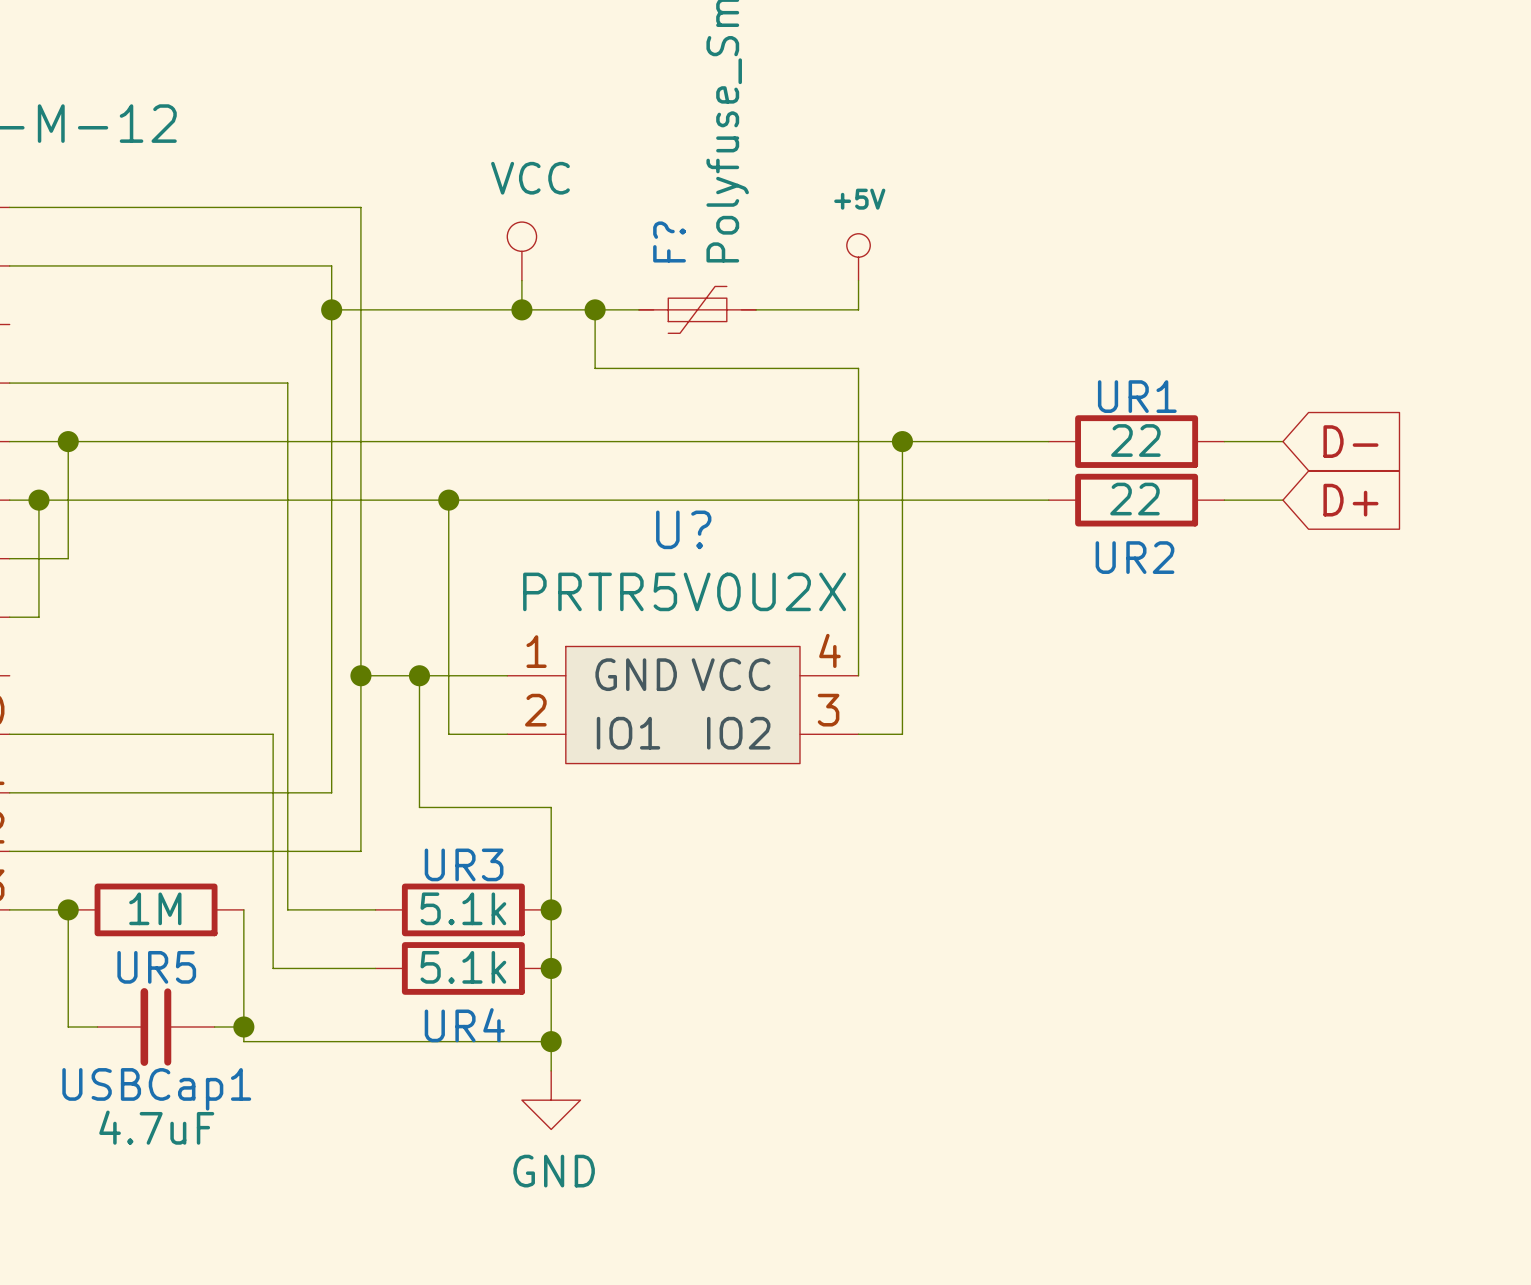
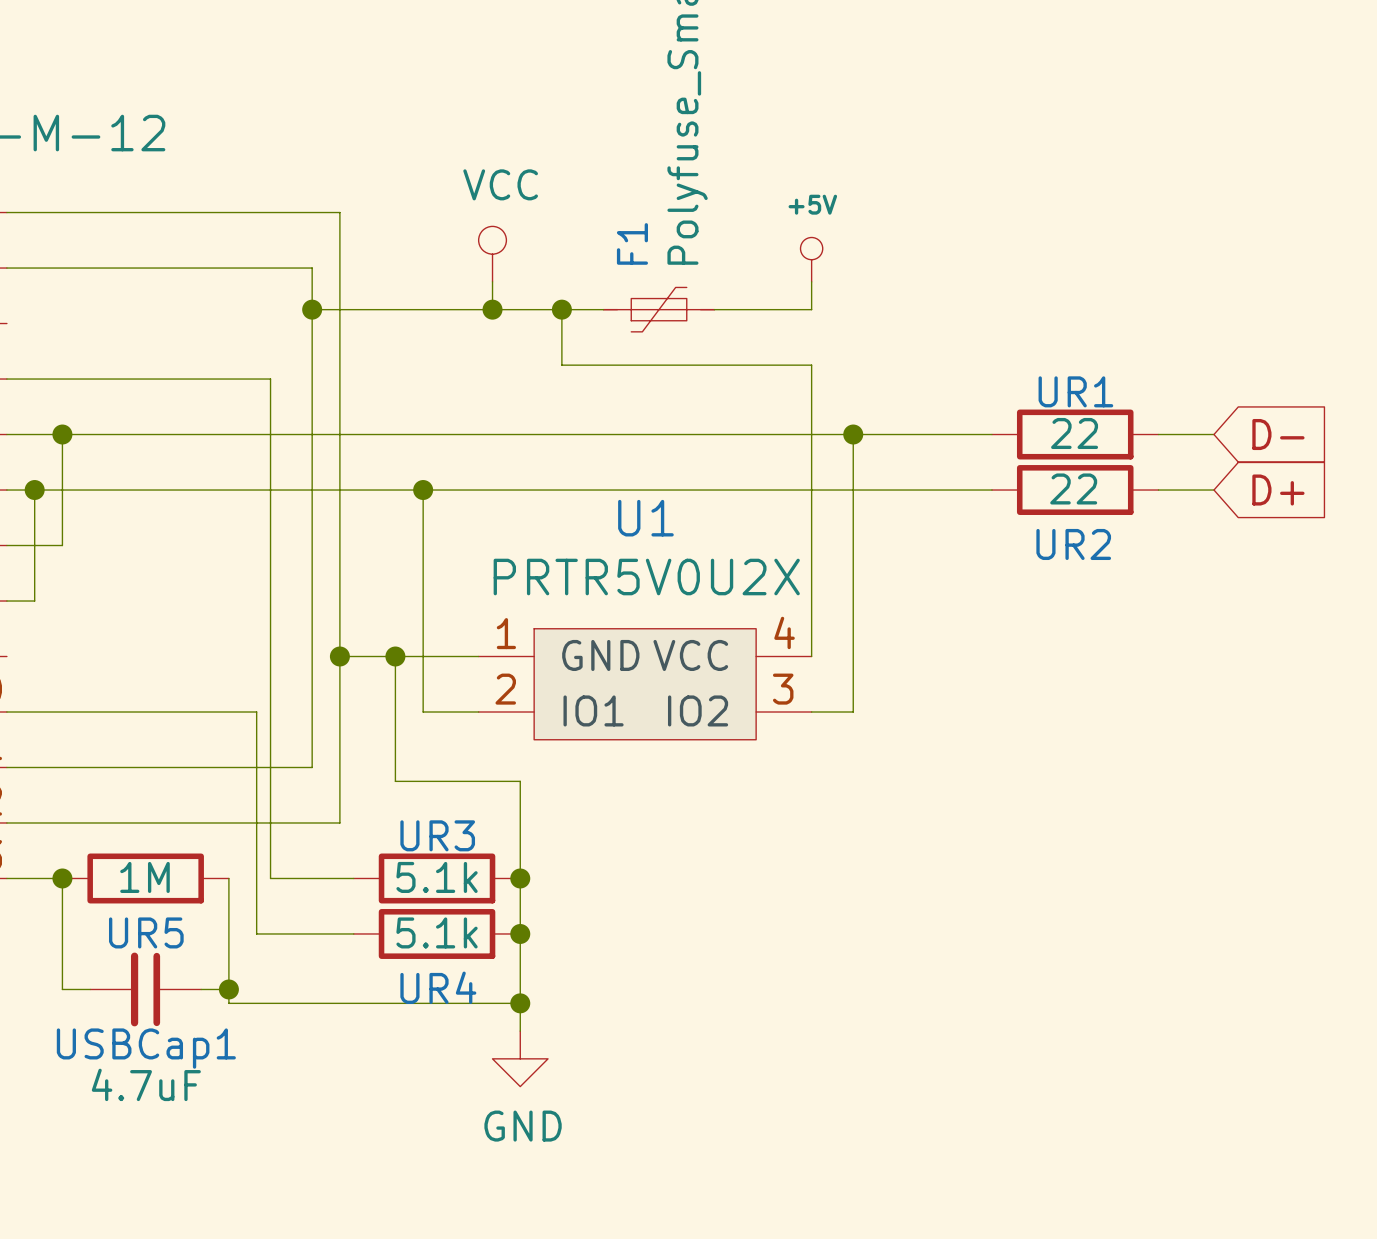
F? name: F? (669, 241) -> F1 (632, 243)
U? name: U? (683, 529) -> U1 (645, 518)

